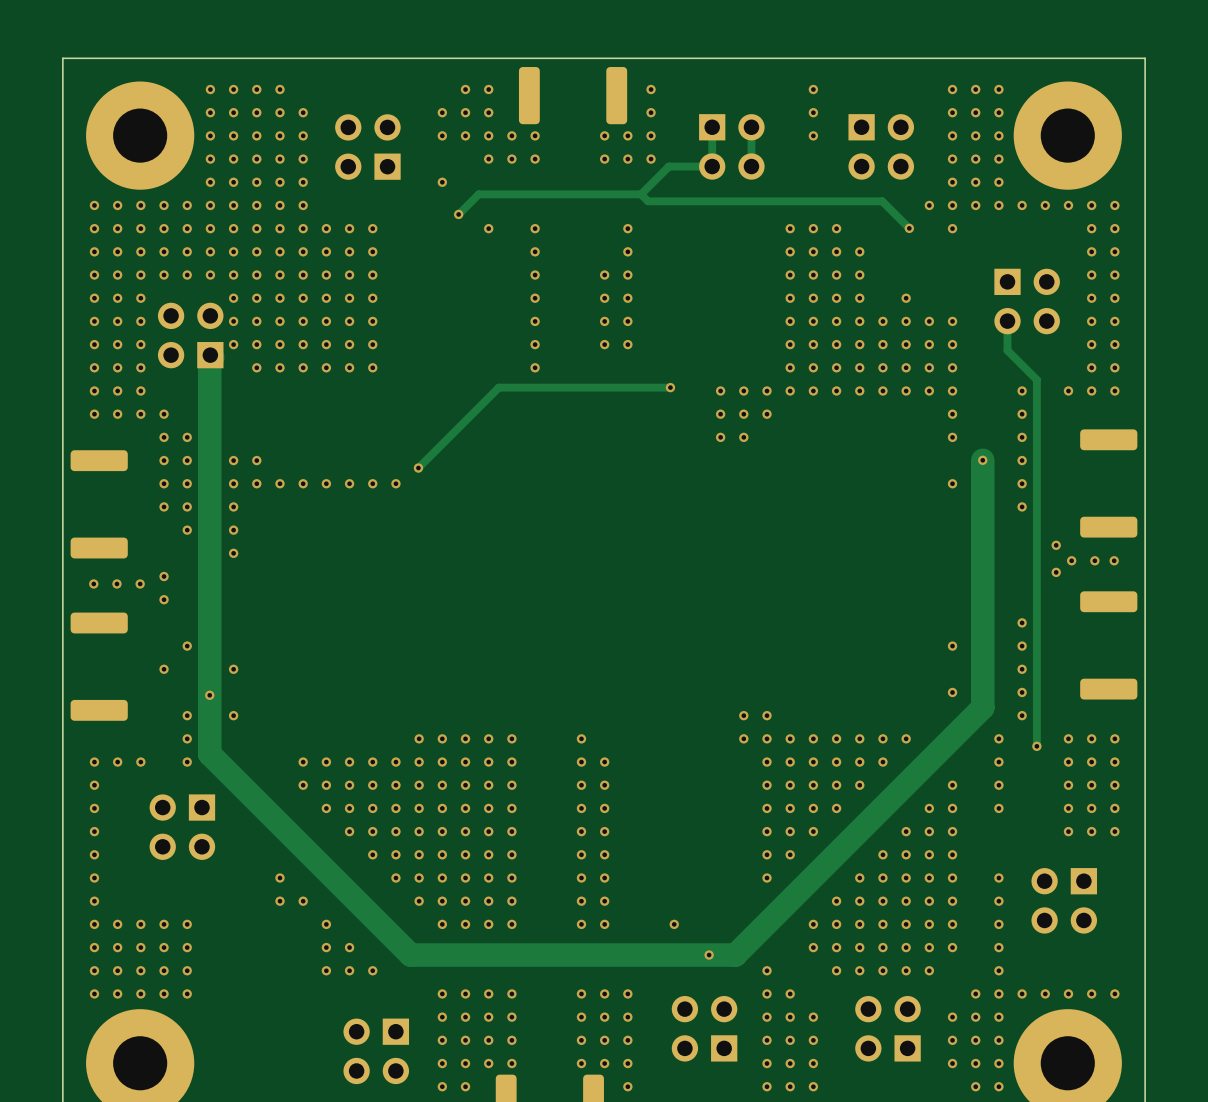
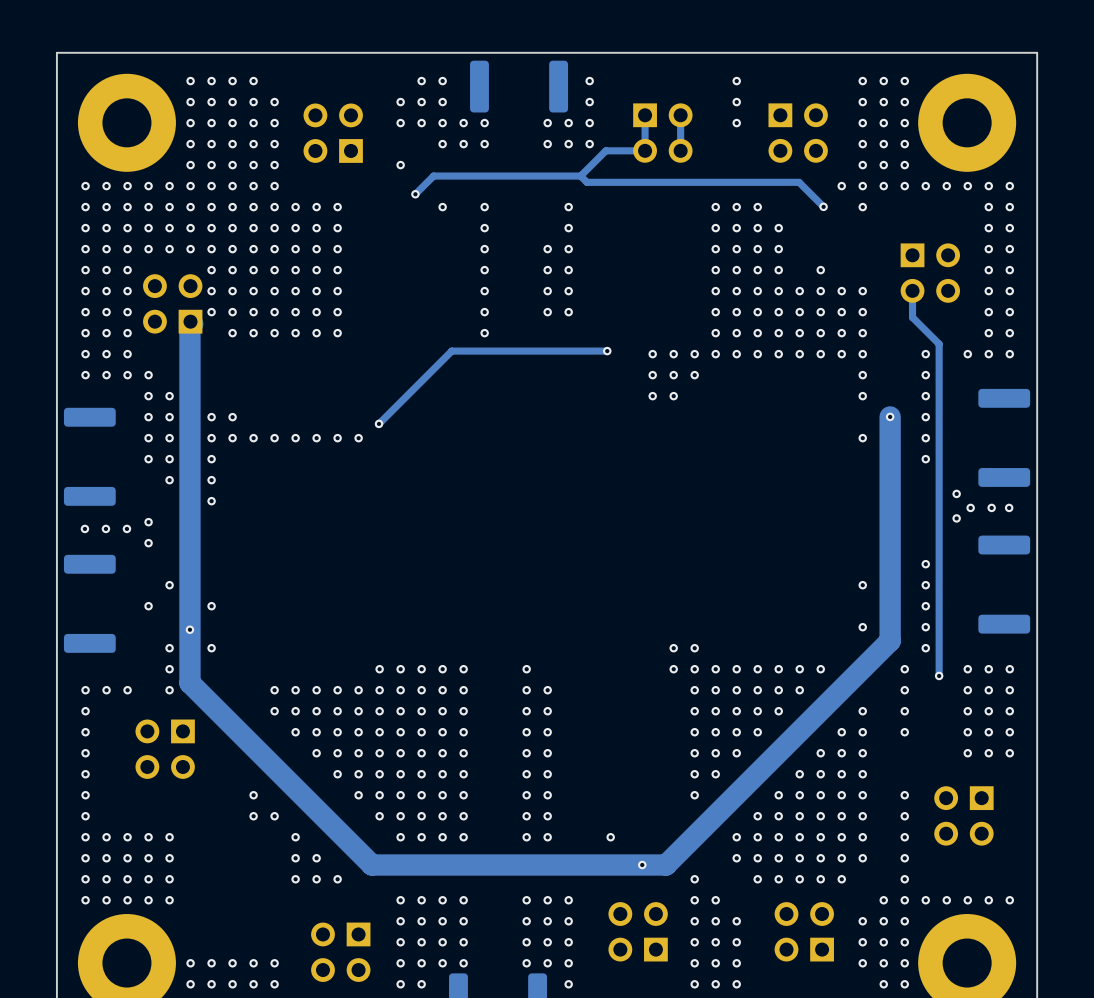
via: none -> (190, 963)
via: none -> (211, 963)
via: none -> (232, 963)
via: none -> (253, 963)
via: none -> (274, 963)
via: none -> (190, 984)
via: none -> (211, 984)
via: none -> (232, 984)
via: none -> (253, 984)
via: none -> (274, 984)

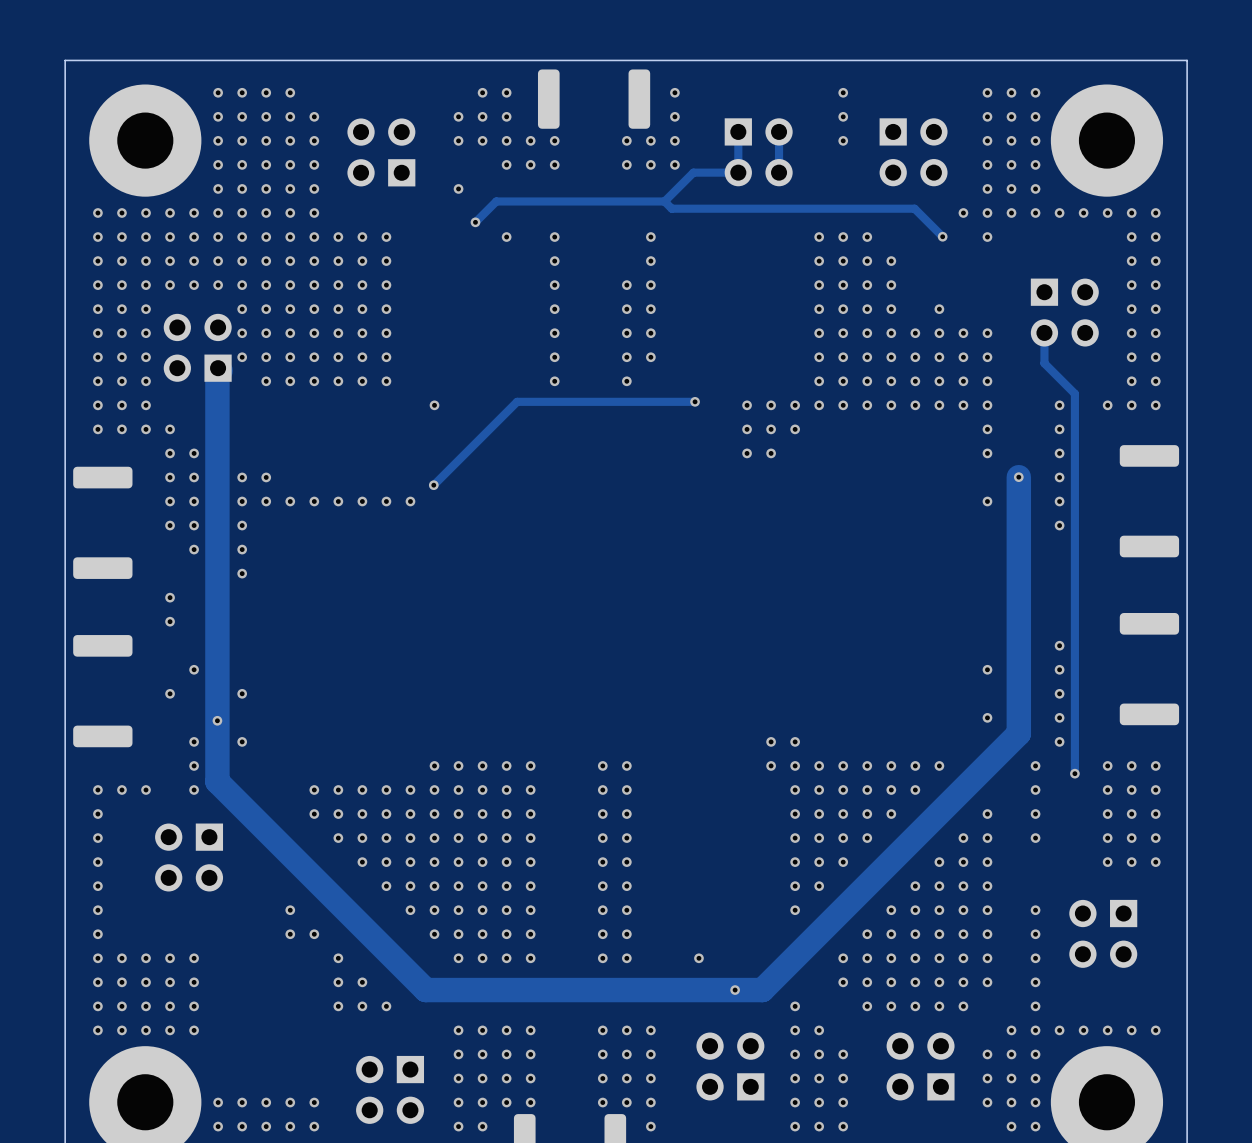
via: none -> (626, 381)
via: none -> (434, 405)
via: (956, 493) -> none
via: (970, 507) -> none
via: (991, 507) -> none
via: (1009, 507) -> none
via: (956, 518) -> none
via: (84, 528) -> none
via: (105, 528) -> none
via: (126, 528) -> none
via: none -> (626, 765)

